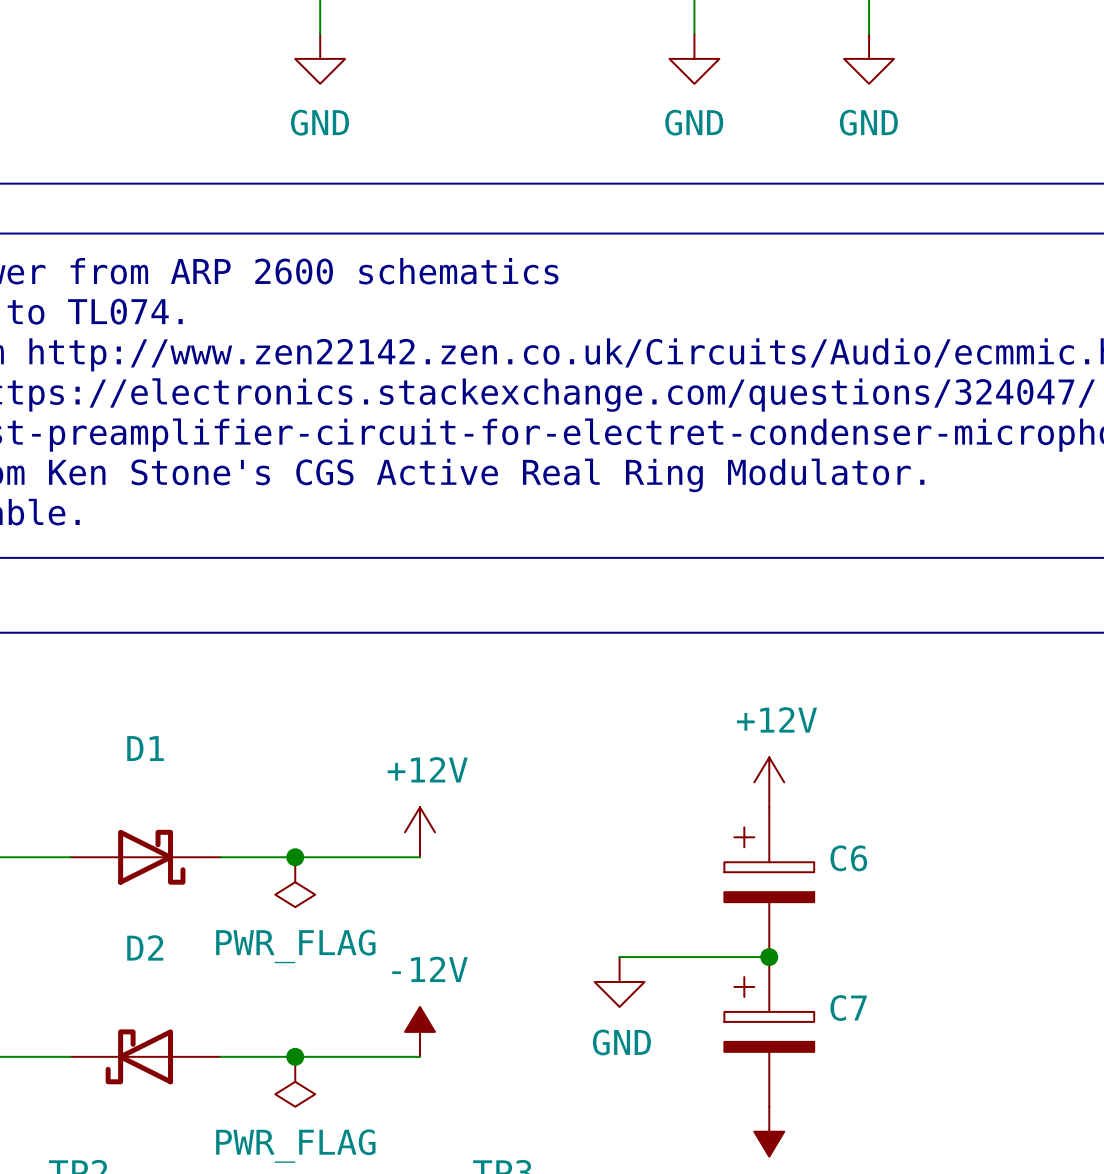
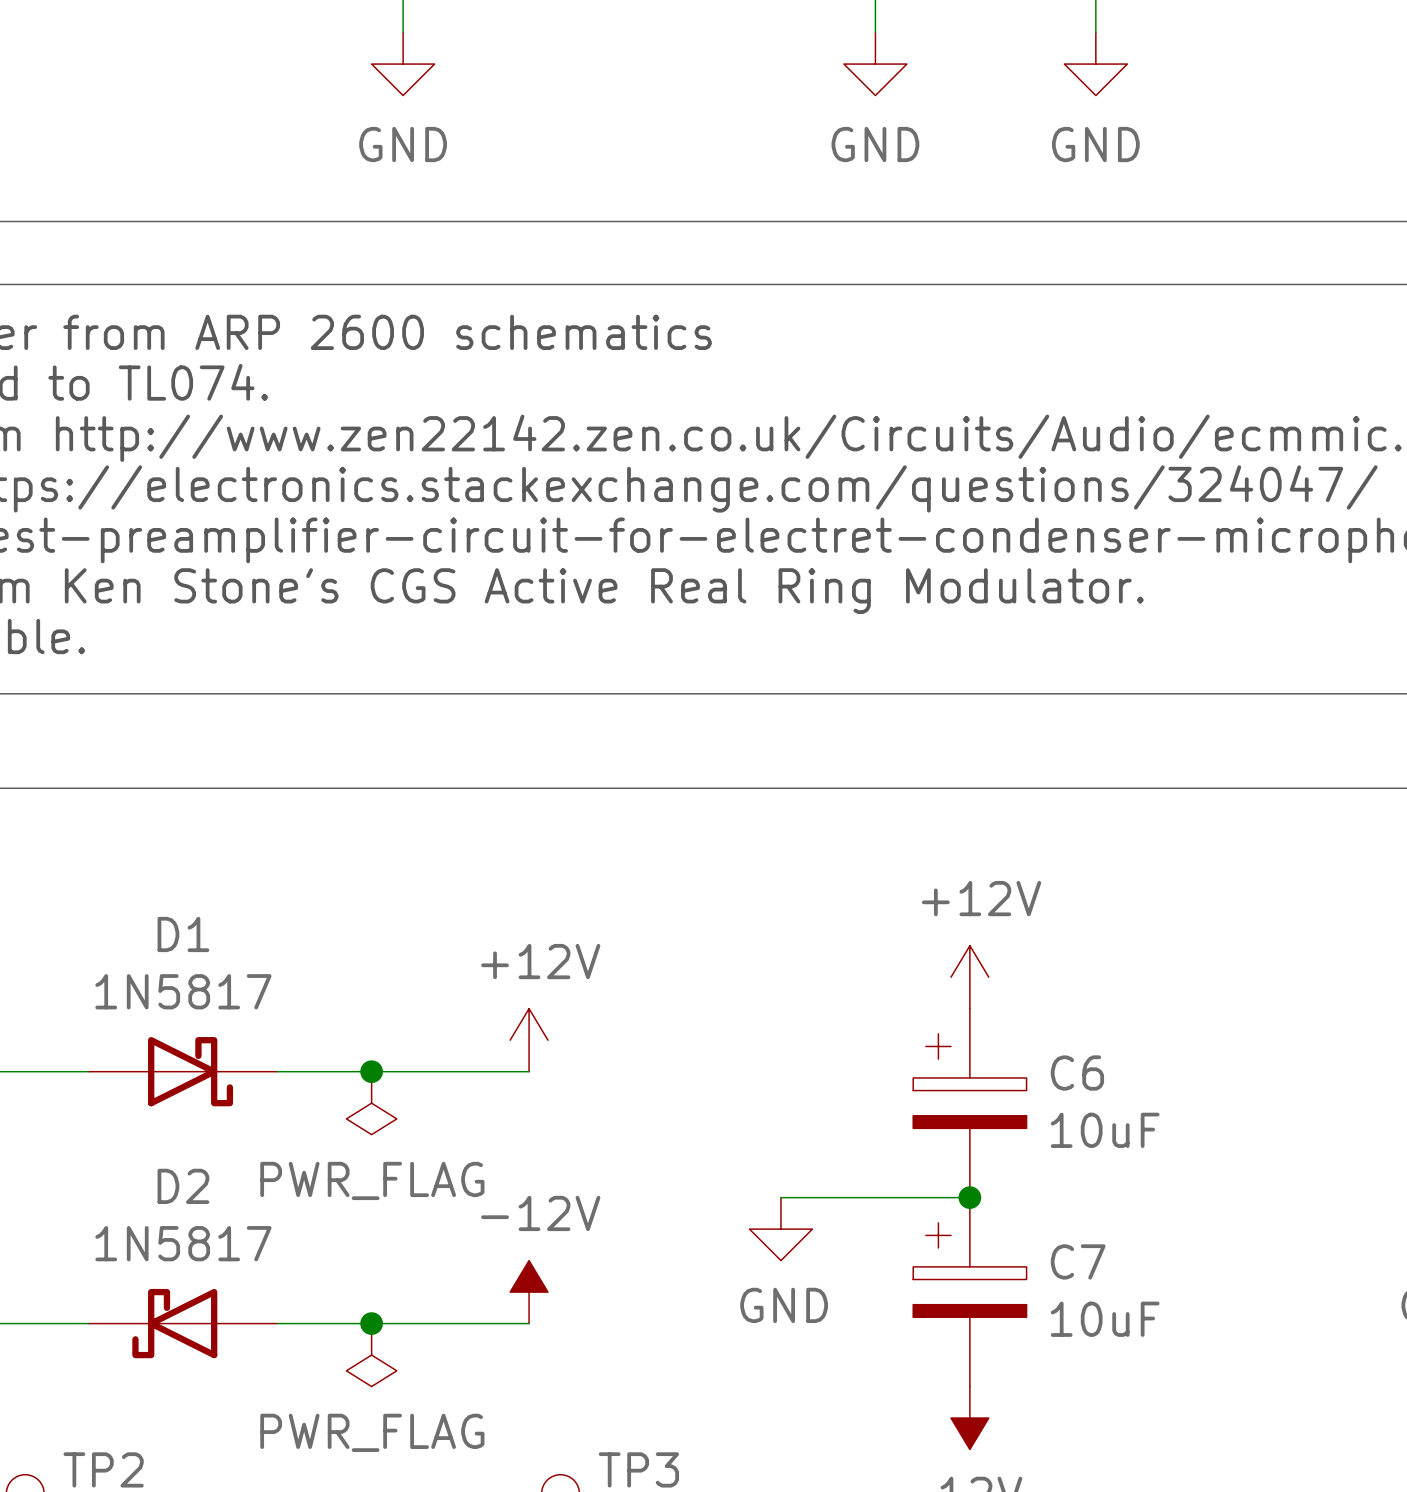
D1 value: none -> 1N5817 (183, 991)
C6 value: none -> 10uF (1105, 1130)
D2 value: none -> 1N5817 (183, 1243)
C7 value: none -> 10uF (1105, 1319)

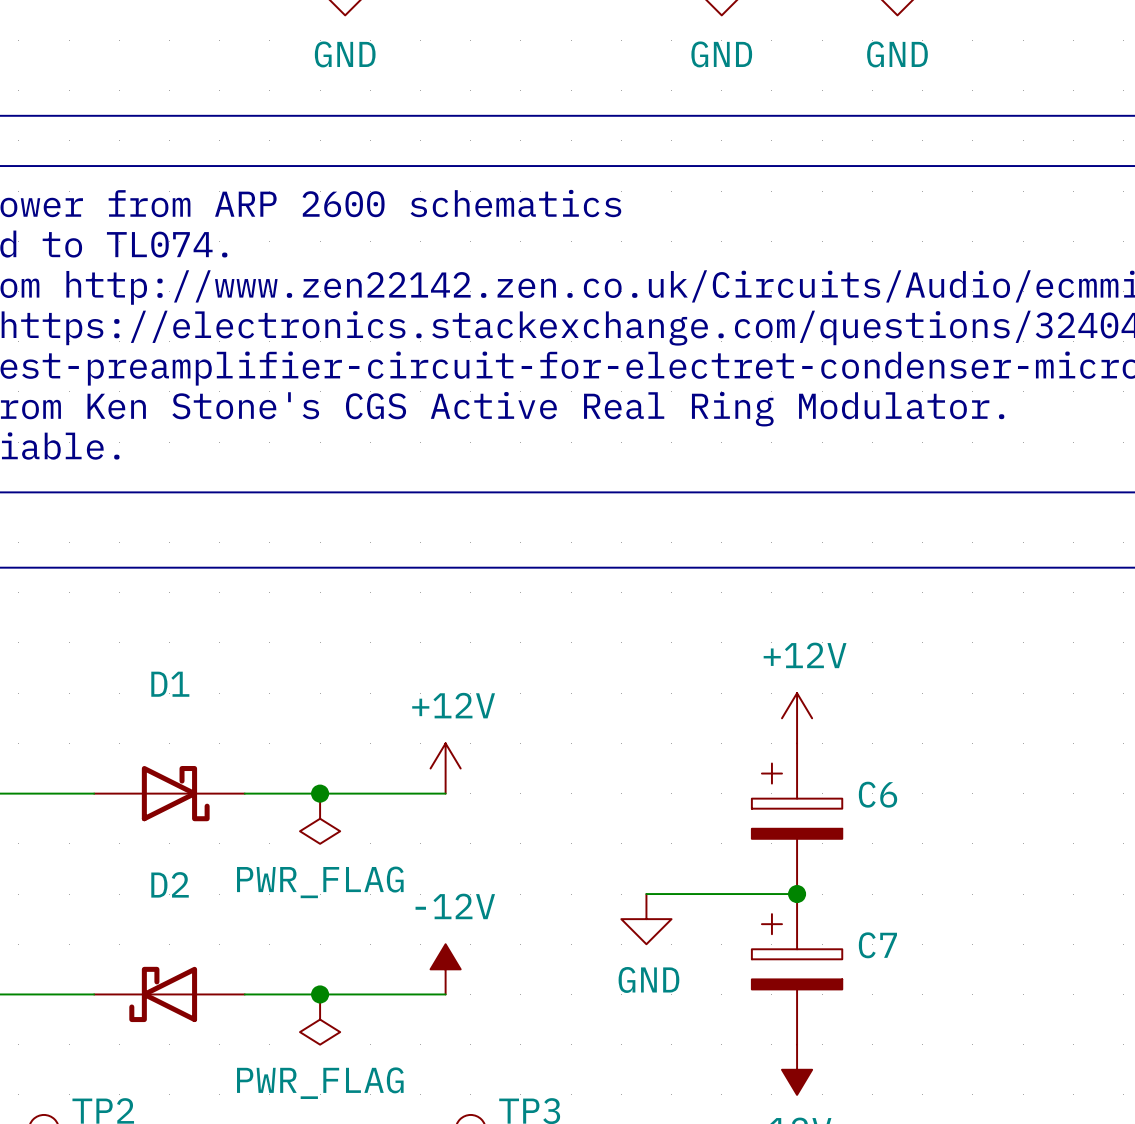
D1 value: 1N5817 (183, 991) -> none
C6 value: 10uF (1105, 1130) -> none
D2 value: 1N5817 (183, 1243) -> none
C7 value: 10uF (1105, 1319) -> none

